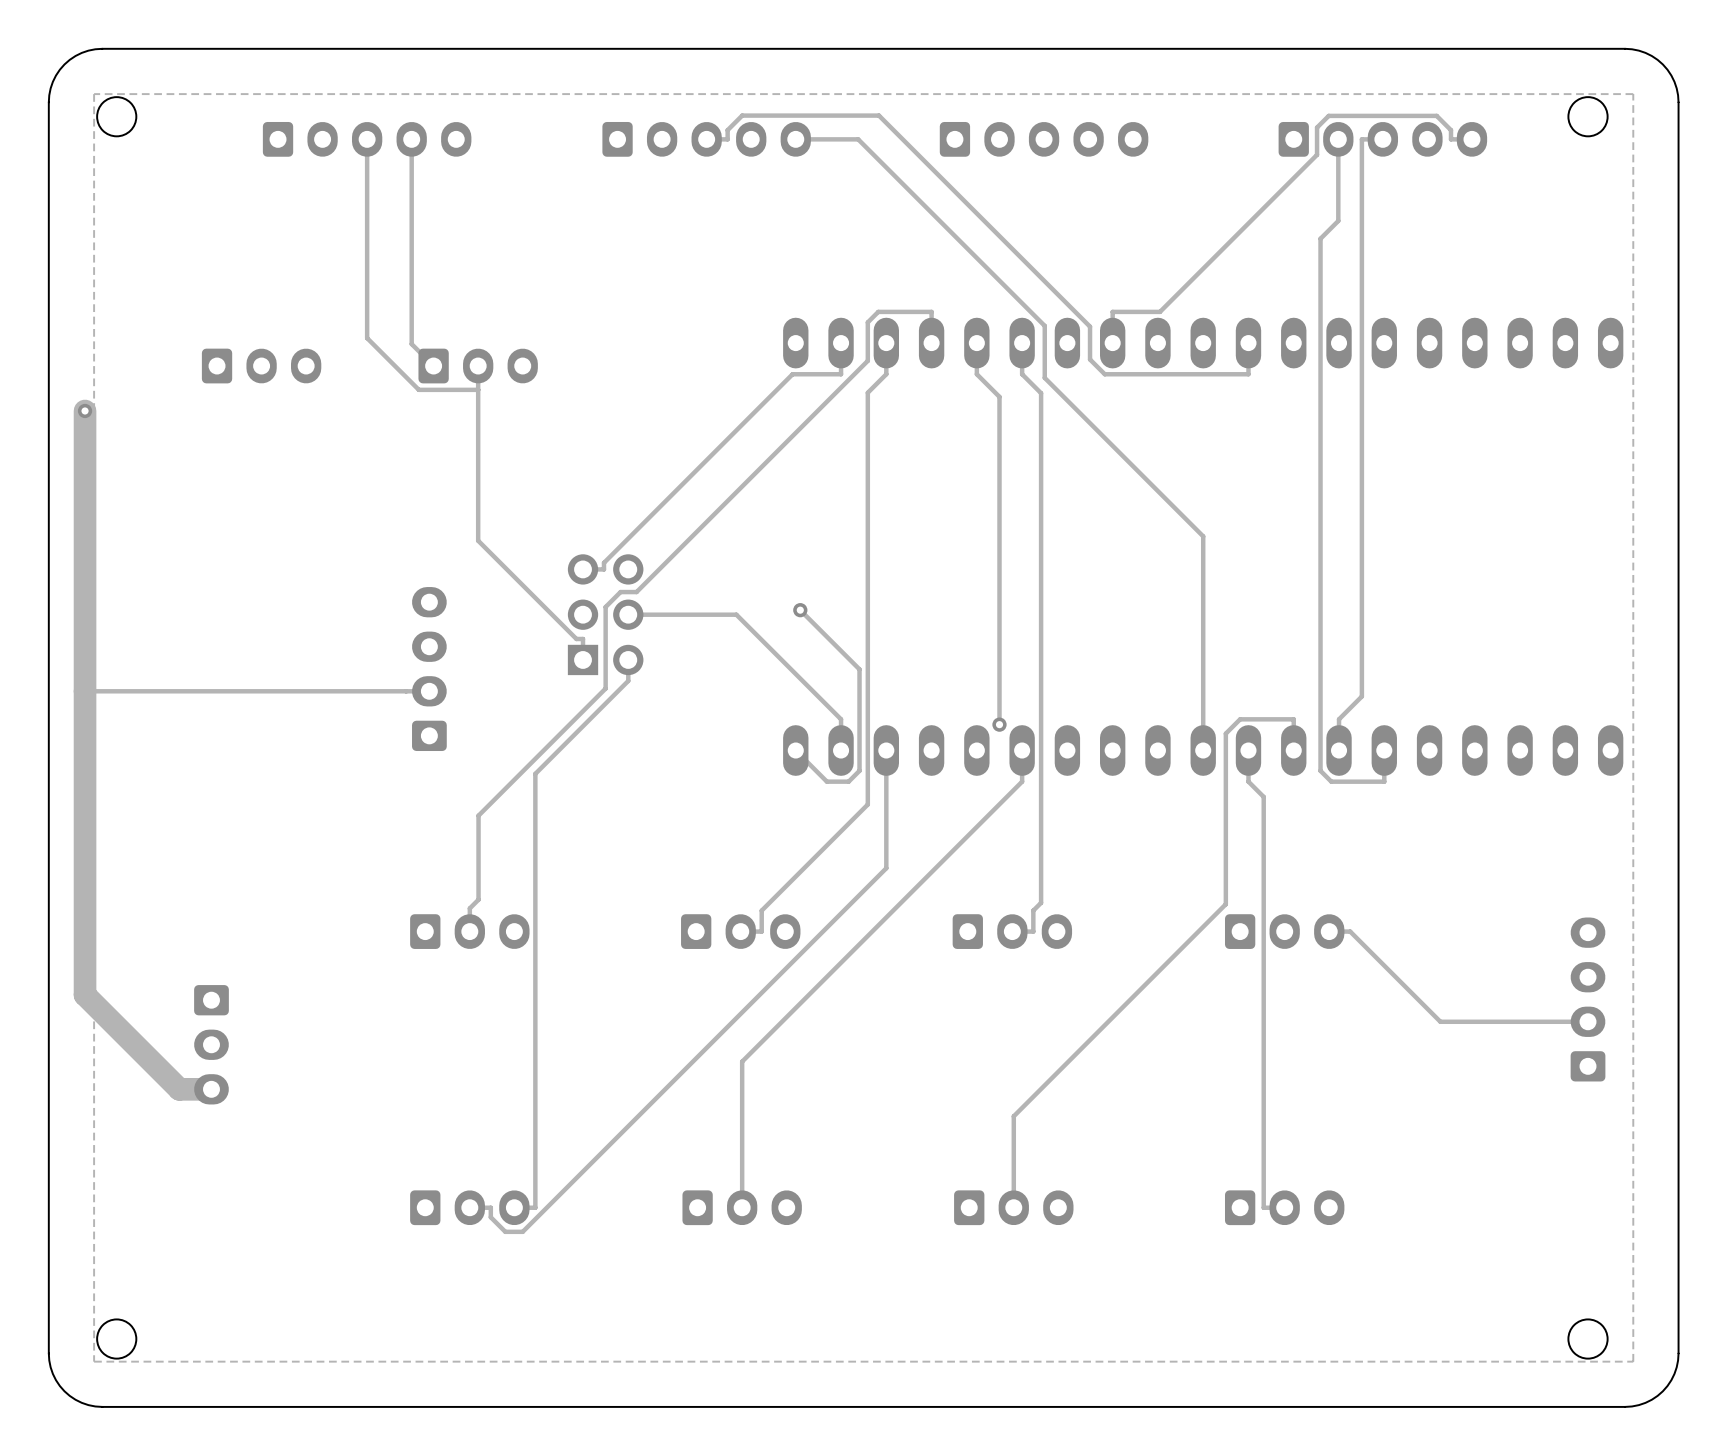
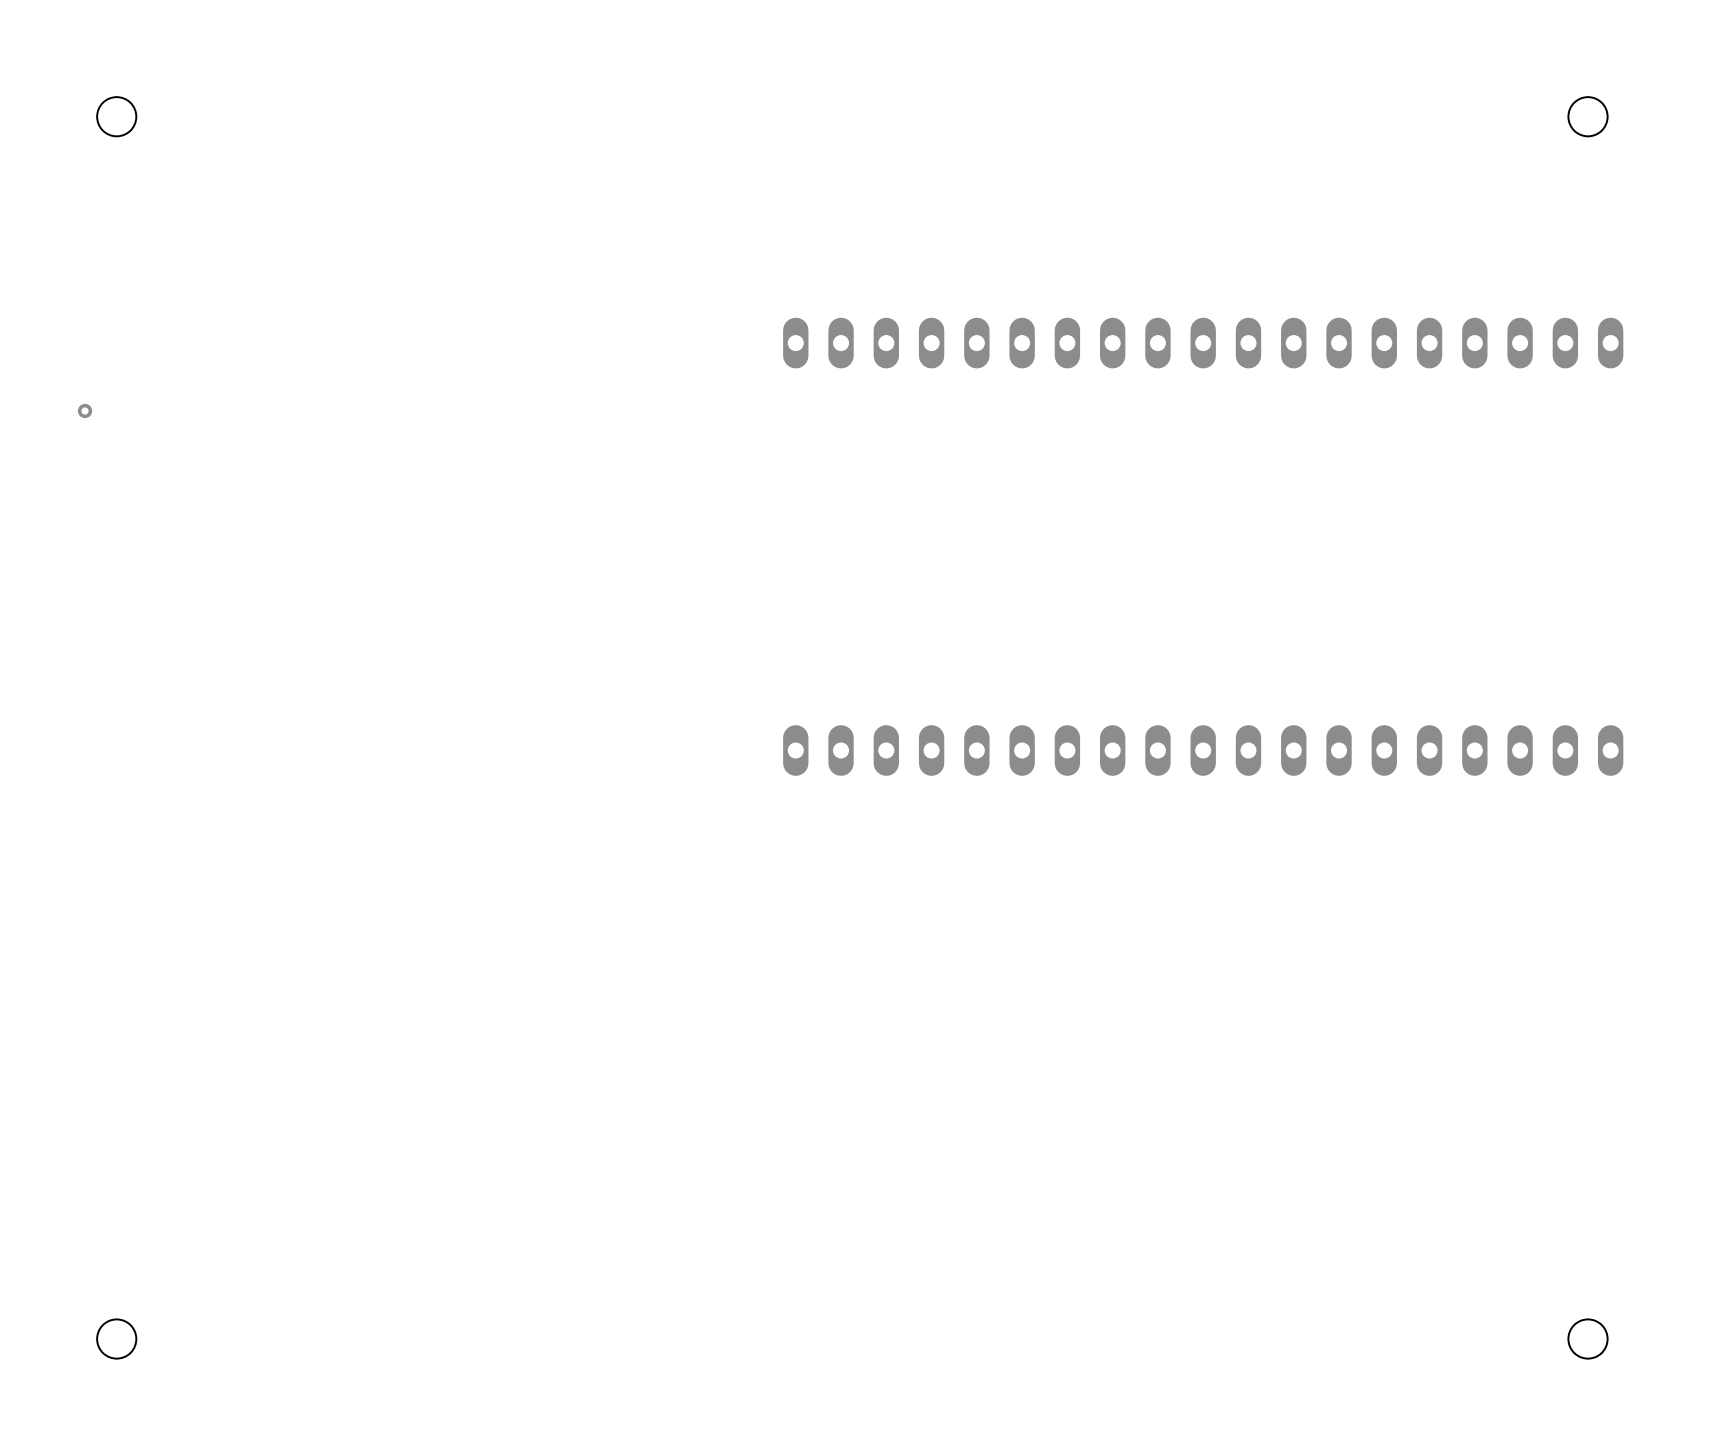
board edge: (1625, 48) (102, 48) (88, 50) (69, 59) (59, 69) (52, 81) (48, 102) (48, 1353) (52, 1373) (59, 1386) (75, 1399) (88, 1405) (102, 1406) (1625, 1406) (1638, 1405) (1657, 1395) (1671, 1380) (1676, 1367) (1678, 1353) (1678, 102) (1674, 81) (1662, 64) (1645, 52) (1625, 48) -> none
zone outline: (1633, 94) (94, 94) (94, 1361) (1633, 1361) (1633, 94) -> none
track: (367, 139) (367, 338) (418, 389) (478, 389) -> none
part: (367, 139) -> none
track: (411, 139) (411, 344) (433, 366) -> none
track: (706, 139) (727, 139) (727, 130) (742, 115) (878, 115) (1090, 326) (1090, 359) (1104, 374) (1248, 374) (1248, 343) -> none
part: (706, 139) -> none
track: (795, 139) (858, 139) (1044, 325) (1044, 377) (1203, 536) (1203, 750) -> none
part: (1044, 139) -> none
track: (1338, 139) (1338, 220) (1320, 238) (1320, 770) (1331, 781) (1384, 781) (1384, 750) -> none
track: (1382, 139) (1361, 139) (1361, 696) (1339, 719) (1339, 750) -> none
part: (1382, 139) -> none
track: (1471, 139) (1451, 139) (1451, 130) (1436, 115) (1328, 115) (1317, 127) (1317, 154) (1160, 311) (1112, 311) (1112, 343) -> none
track: (841, 343) (841, 374) (792, 374) (603, 562) (603, 569) (583, 569) -> none
track: (886, 343) (886, 374) (867, 392) (867, 804) (761, 910) (761, 931) (740, 931) -> none
track: (931, 343) (931, 311) (878, 311) (867, 322) (867, 360) (636, 592) (620, 592) (605, 607) (605, 688) (478, 815) (478, 899) (469, 908) (469, 931) -> none
track: (976, 343) (976, 374) (999, 396) (999, 724) -> none
track: (1022, 343) (1022, 374) (1041, 393) (1041, 902) (1033, 910) (1033, 931) (1012, 931) -> none
part: (261, 366) -> none
track: (478, 366) (478, 540) (576, 638) (583, 638) (583, 659) -> none
part: (478, 366) -> none
track: (85, 410) (85, 994) (179, 1089) (211, 1089) -> none
track: (800, 610) (859, 669) (859, 770) (848, 781) (826, 781) (795, 750) -> none
via: (800, 610) -> none
part: (605, 614) -> none
track: (628, 614) (736, 614) (841, 719) (841, 750) -> none
track: (628, 659) (628, 680) (535, 773) (535, 1207) (514, 1207) -> none
part: (429, 669) -> none
track: (429, 691) (85, 691) -> none
via: (999, 724) -> none
track: (886, 750) (886, 868) (522, 1231) (505, 1231) (490, 1217) (490, 1207) (469, 1207) -> none
track: (1022, 750) (1022, 781) (742, 1061) (742, 1207) -> none
track: (1248, 750) (1248, 781) (1263, 796) (1263, 1207) (1284, 1207) -> none
track: (1293, 750) (1293, 719) (1240, 719) (1225, 733) (1225, 904) (1013, 1116) (1013, 1207) -> none
part: (469, 931) -> none
part: (740, 931) -> none
part: (1012, 931) -> none
part: (1284, 931) -> none
track: (1329, 931) (1350, 931) (1440, 1021) (1588, 1021) -> none
part: (1588, 999) -> none
part: (211, 1044) -> none
part: (469, 1207) -> none
part: (742, 1207) -> none
part: (1013, 1207) -> none
part: (1284, 1207) -> none

